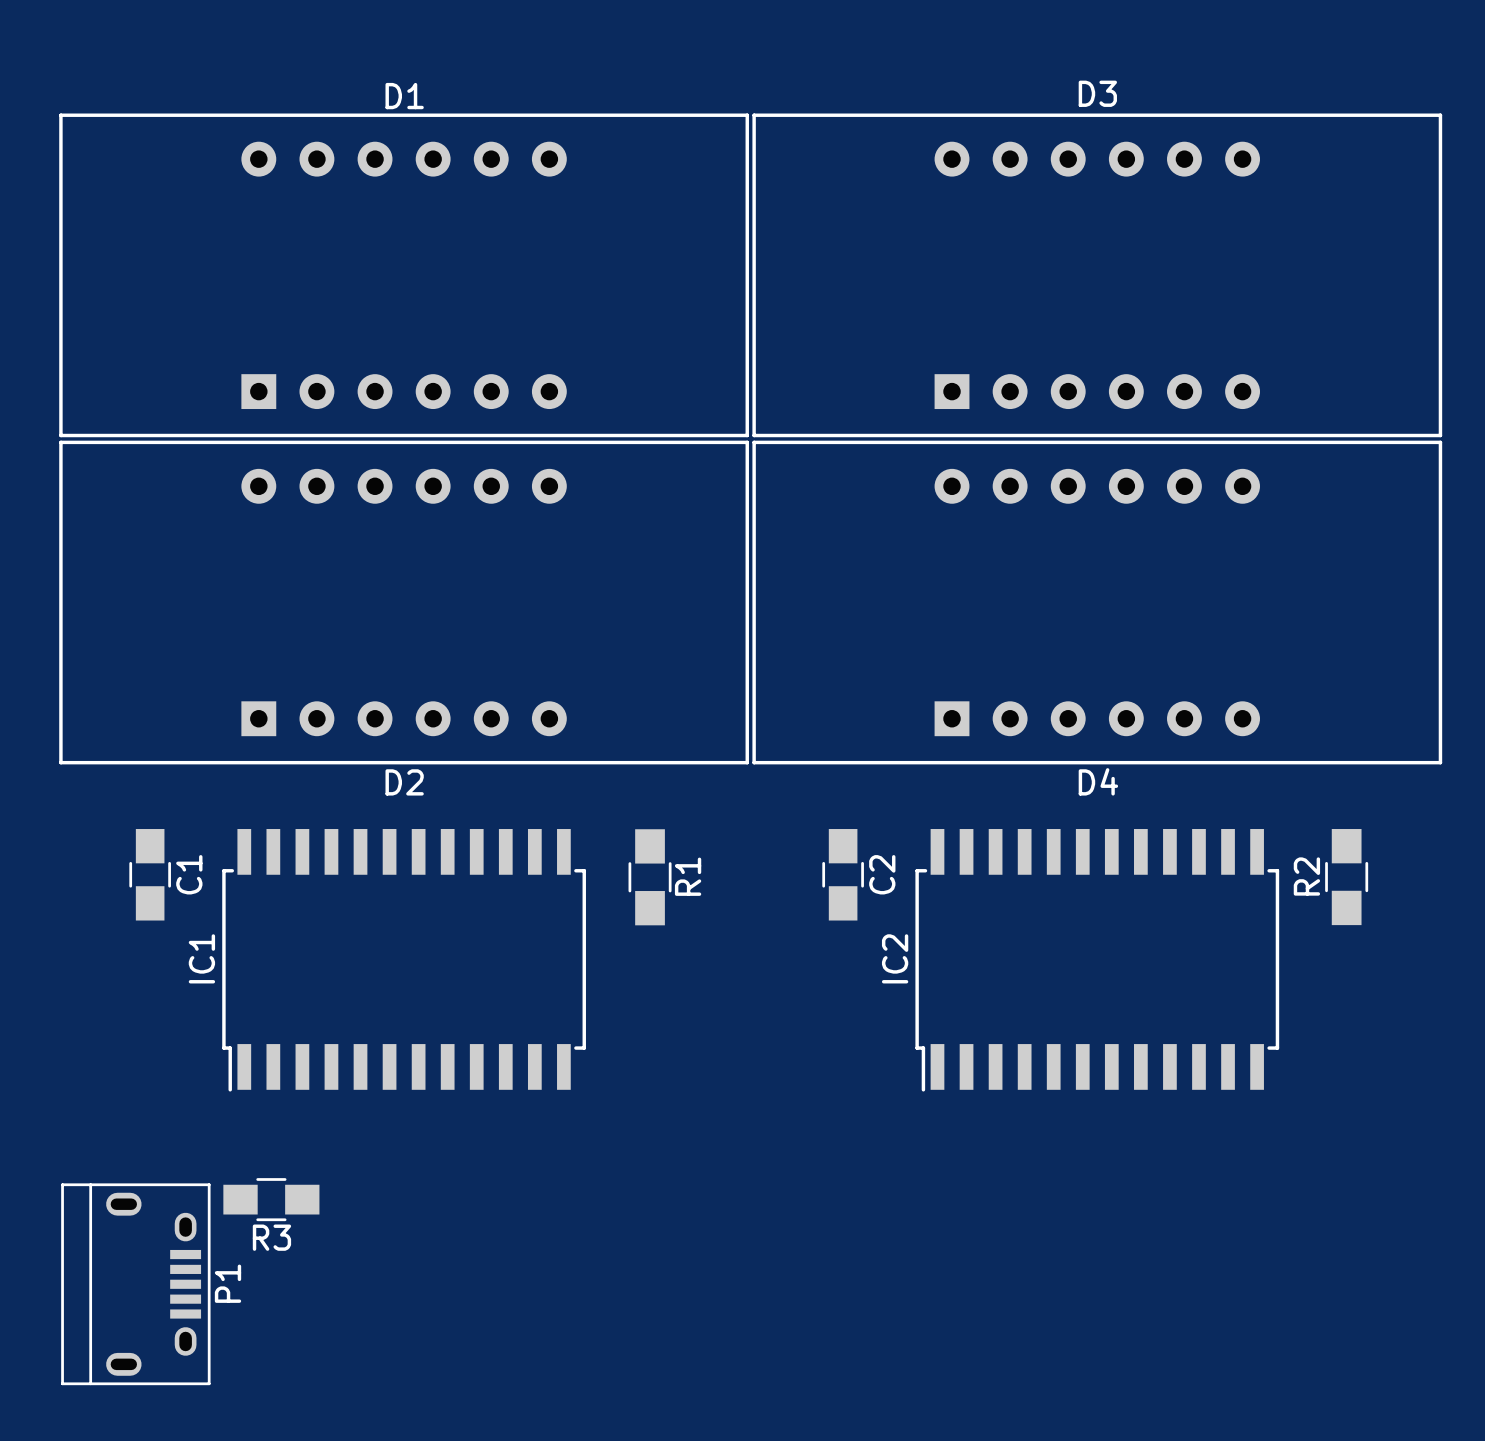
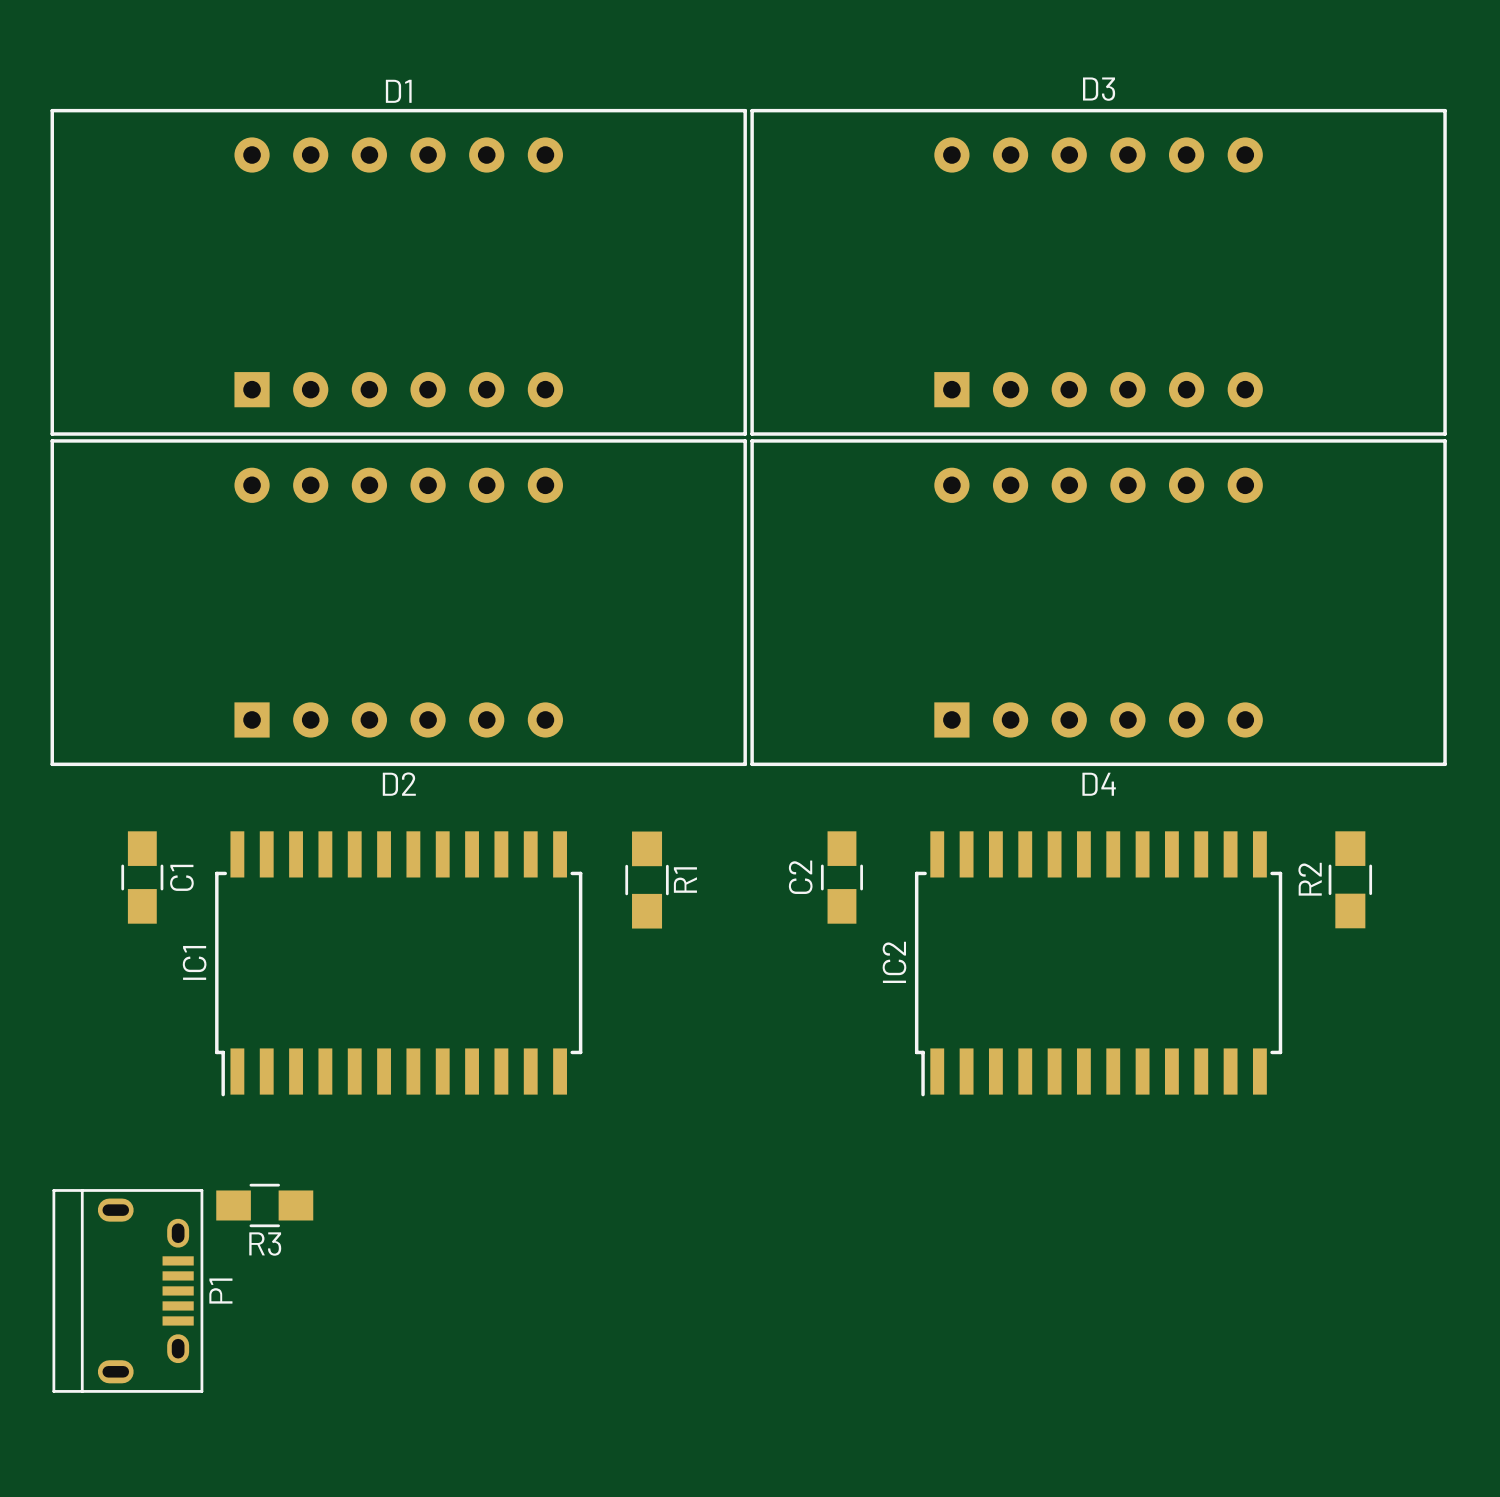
C2 name position: C2 (882, 874) -> C2 (800, 877)

